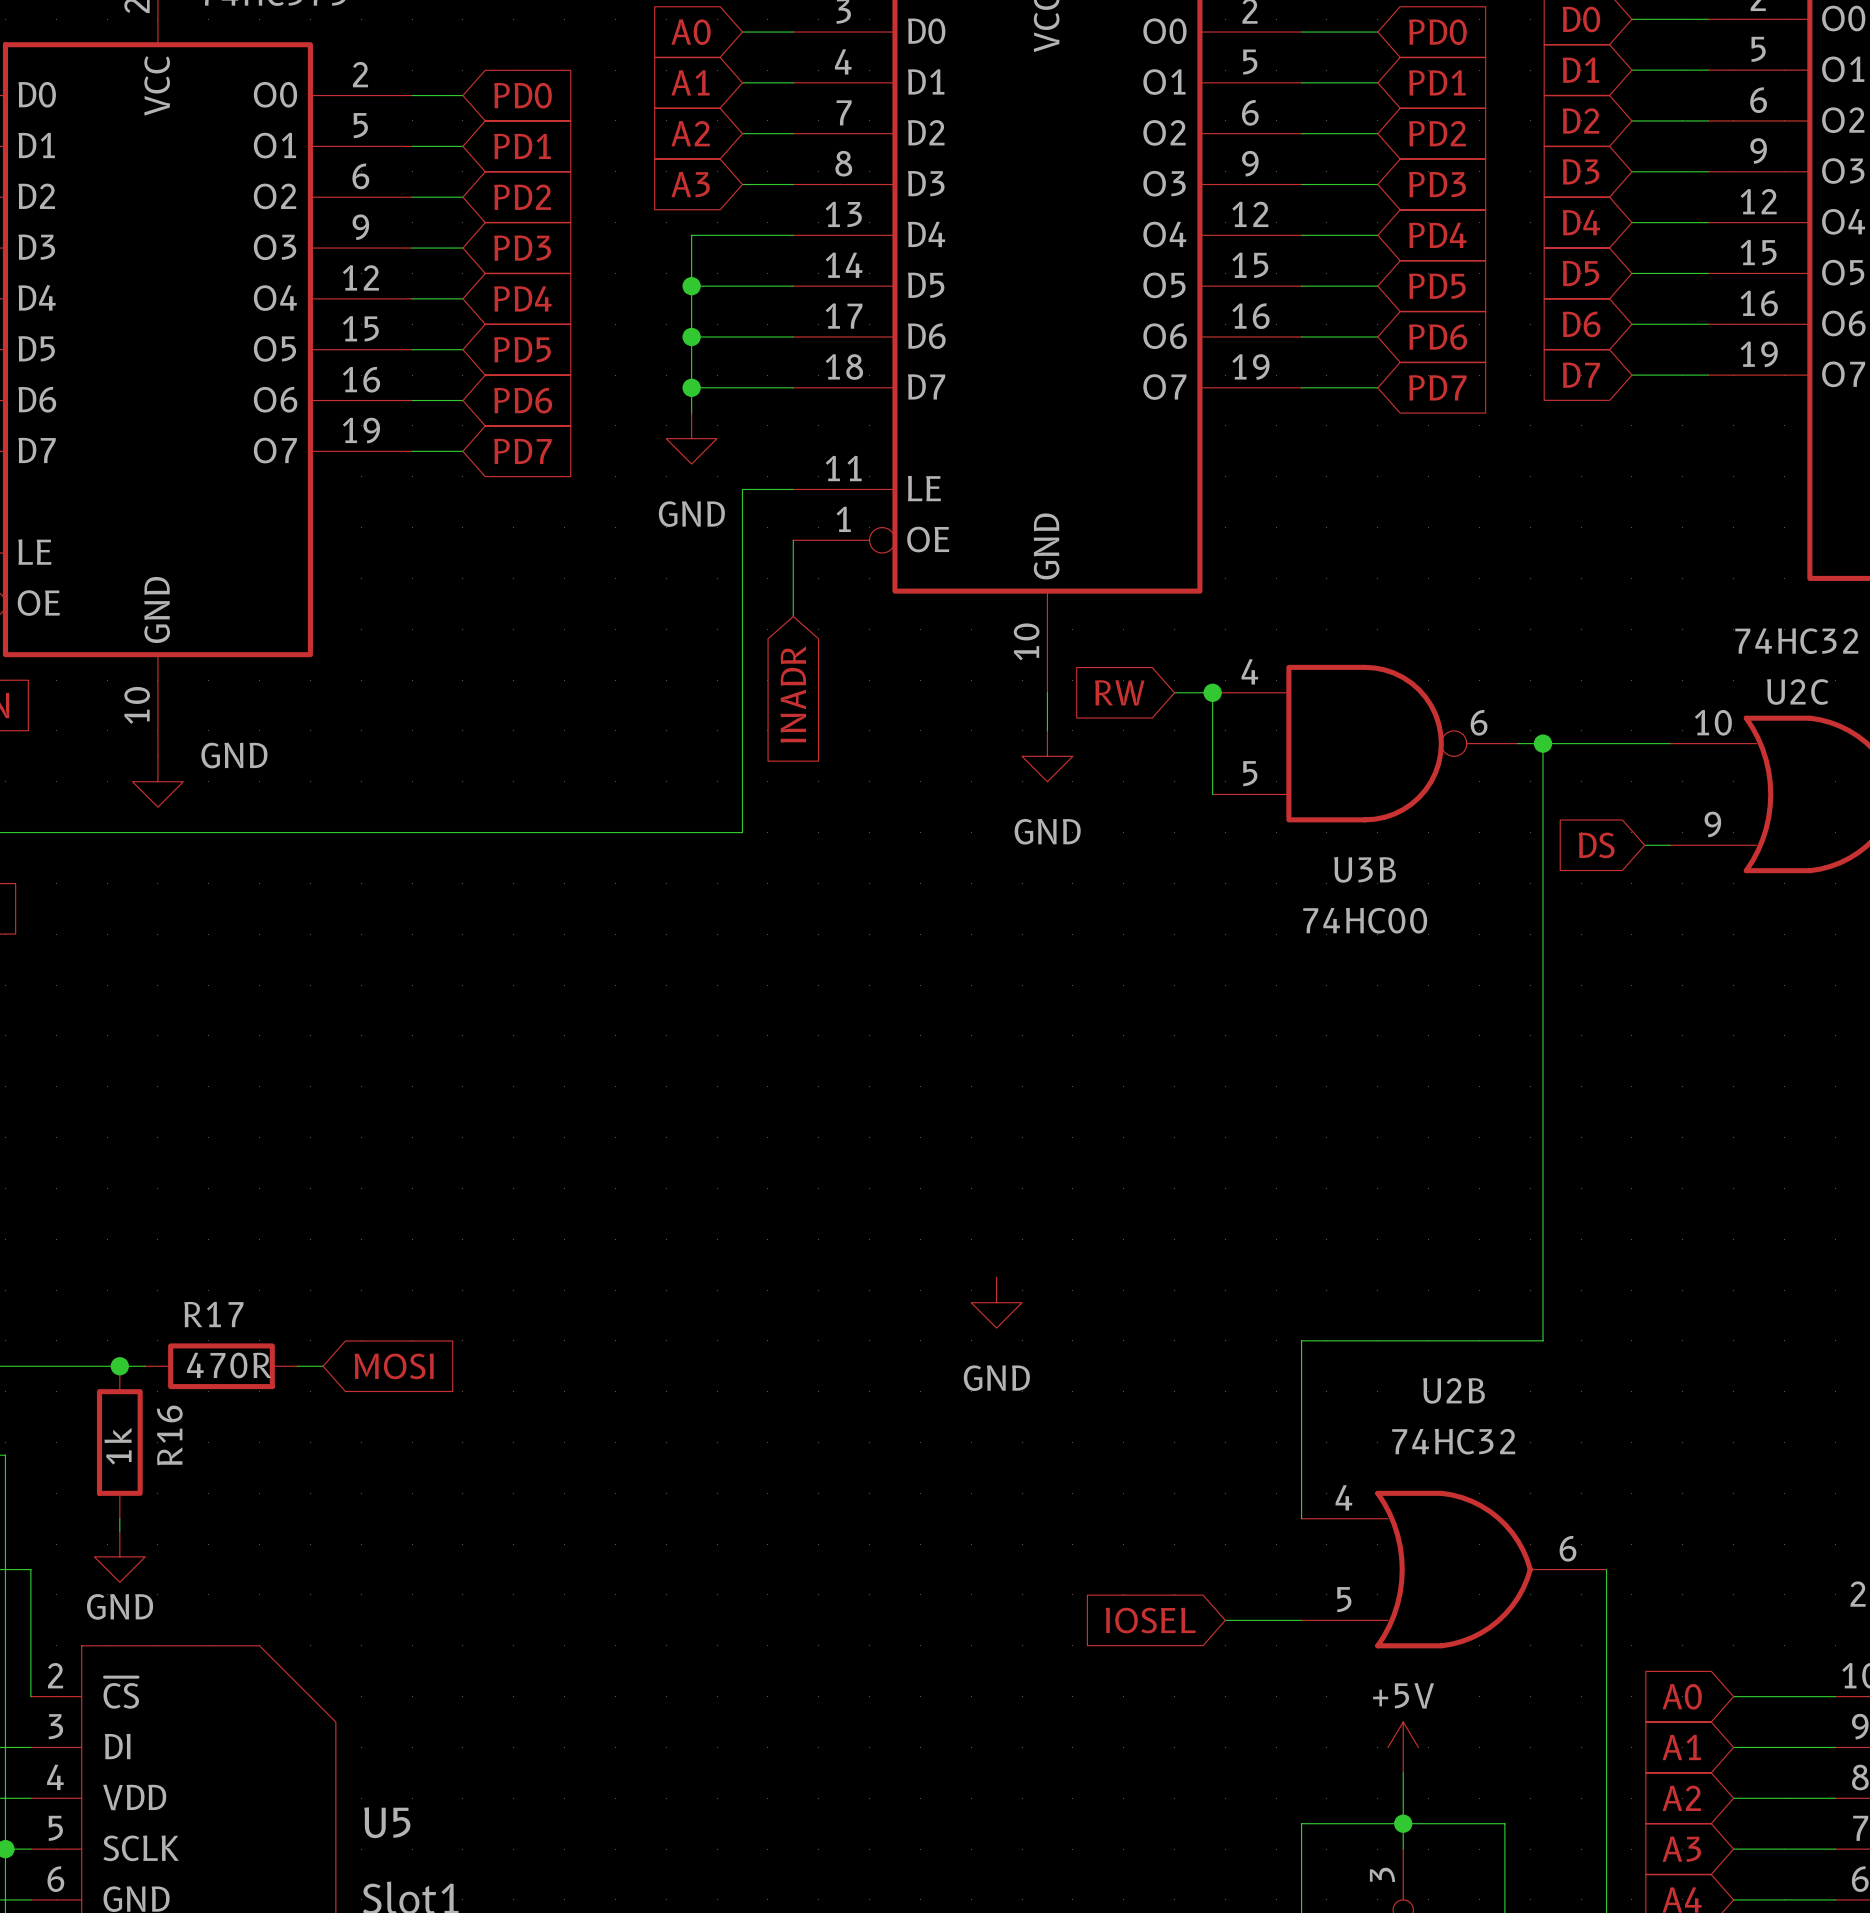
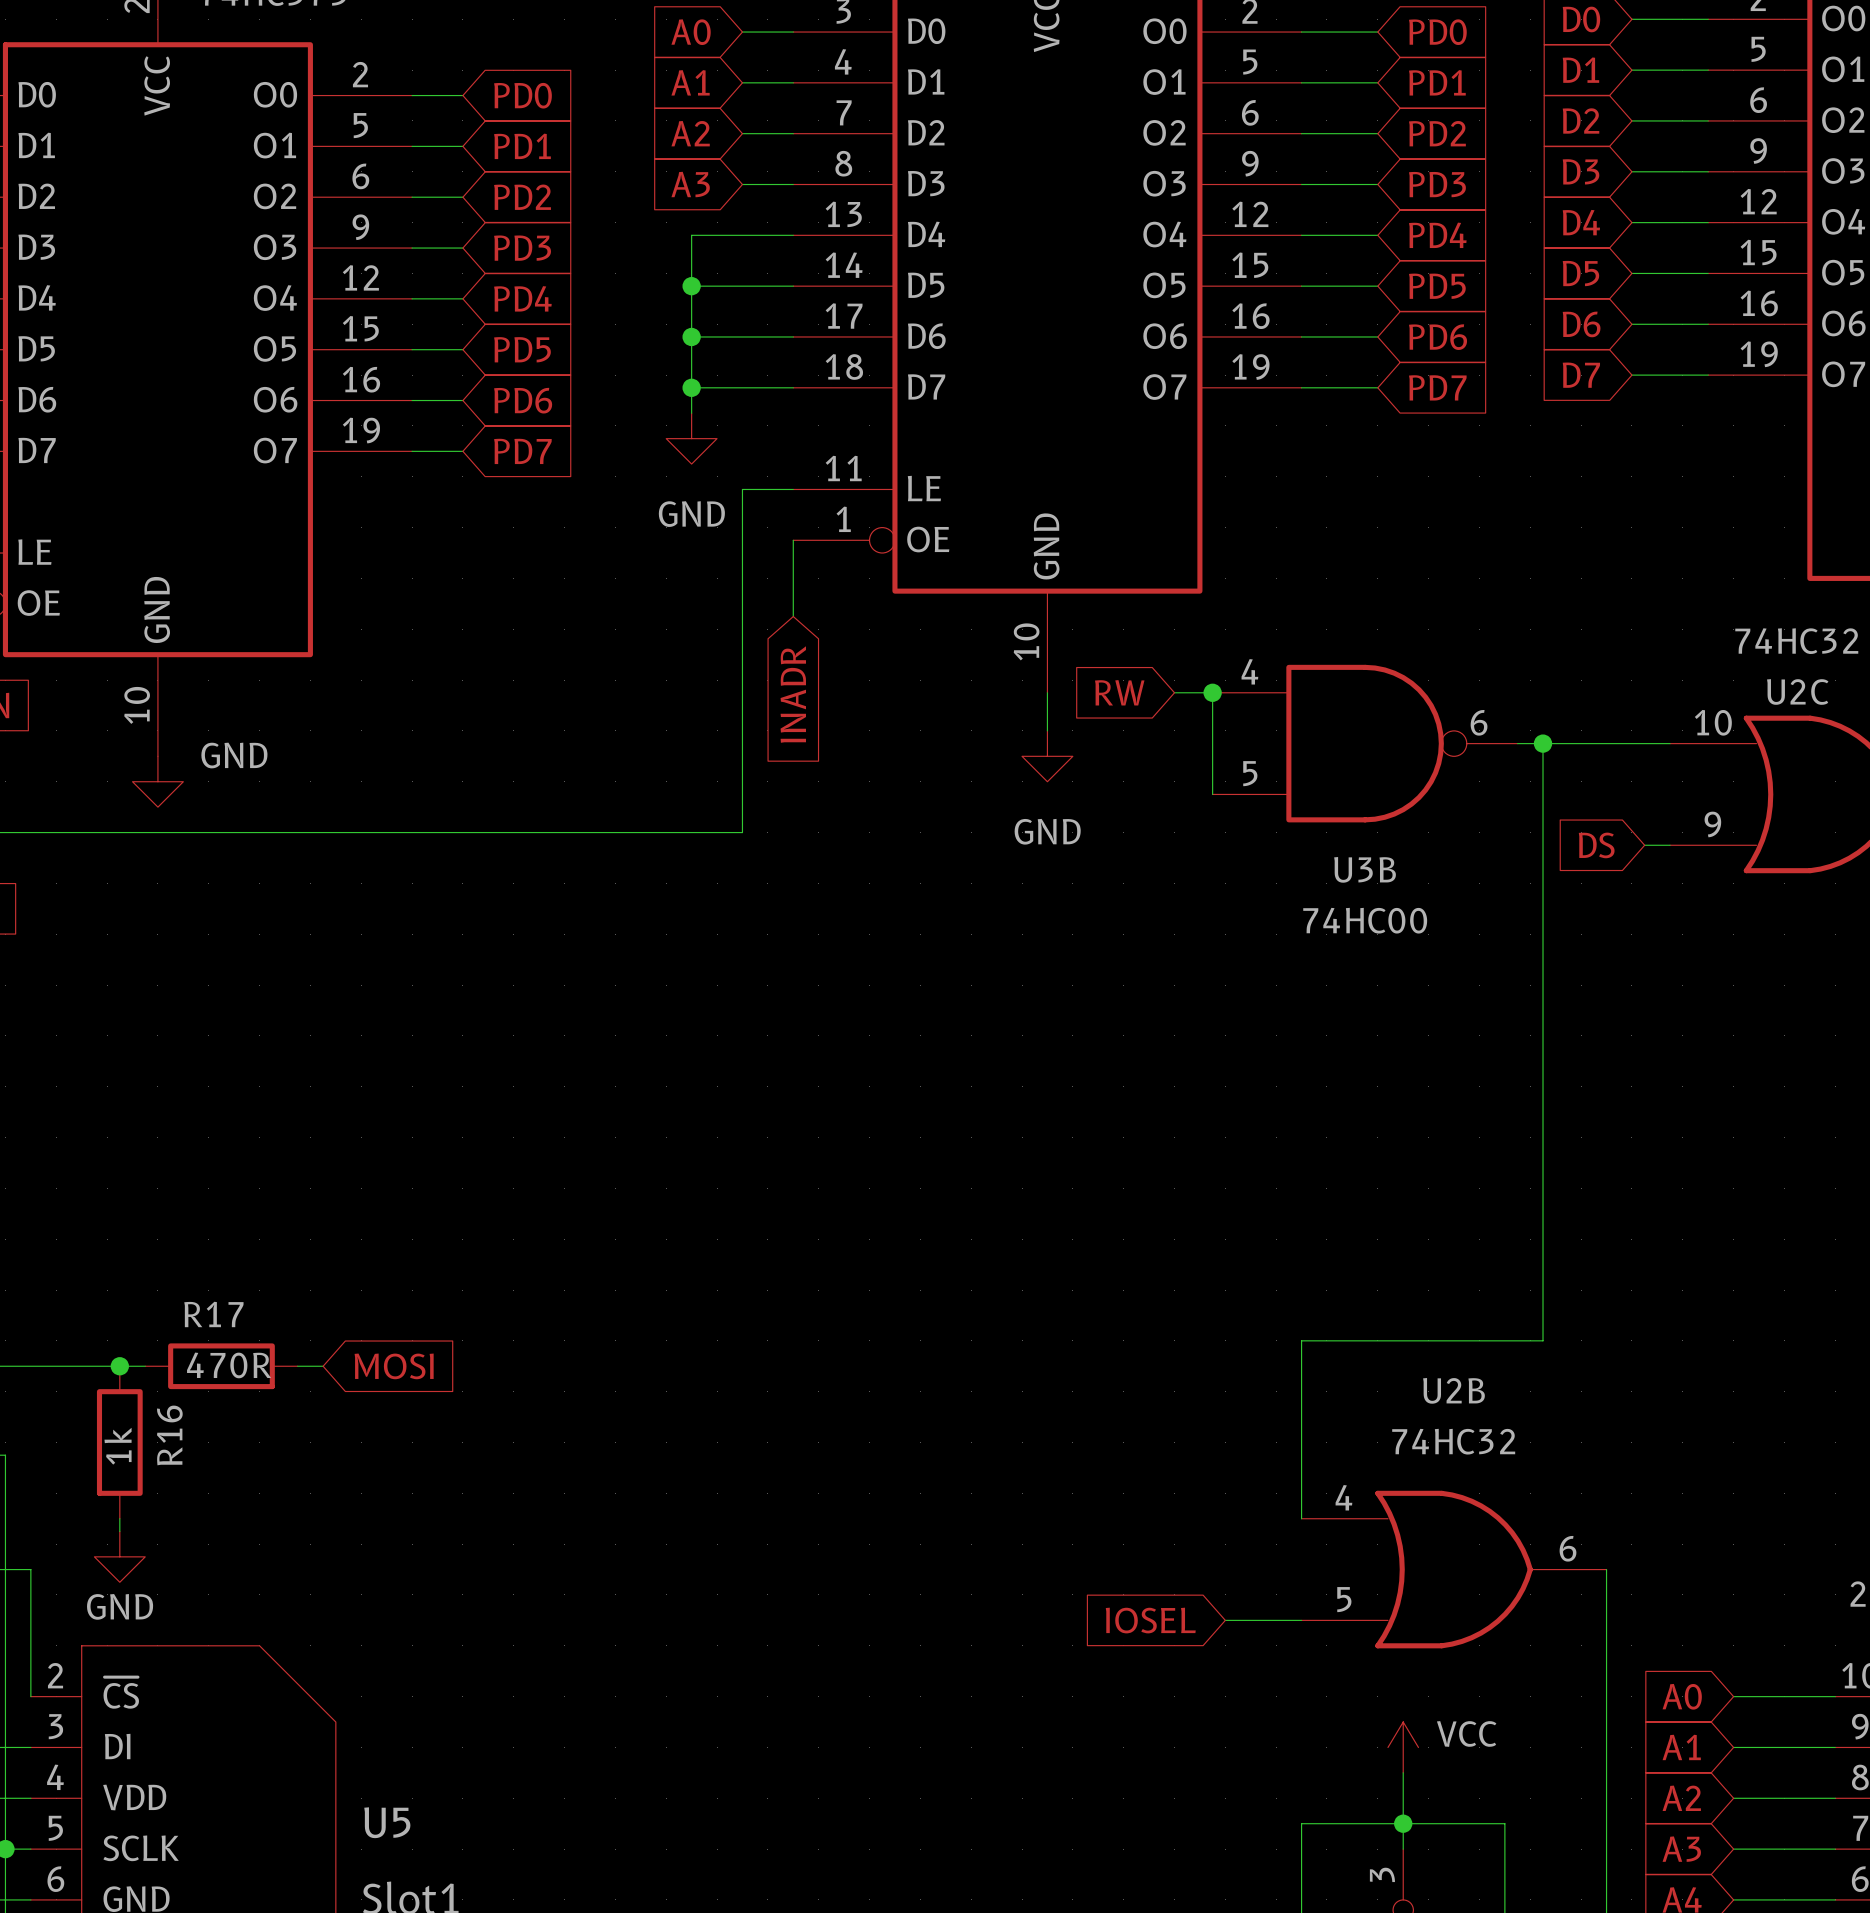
power symbol: GND (996, 1302) -> none
power symbol: +5V (1403, 1747) -> VCC (1403, 1747)

